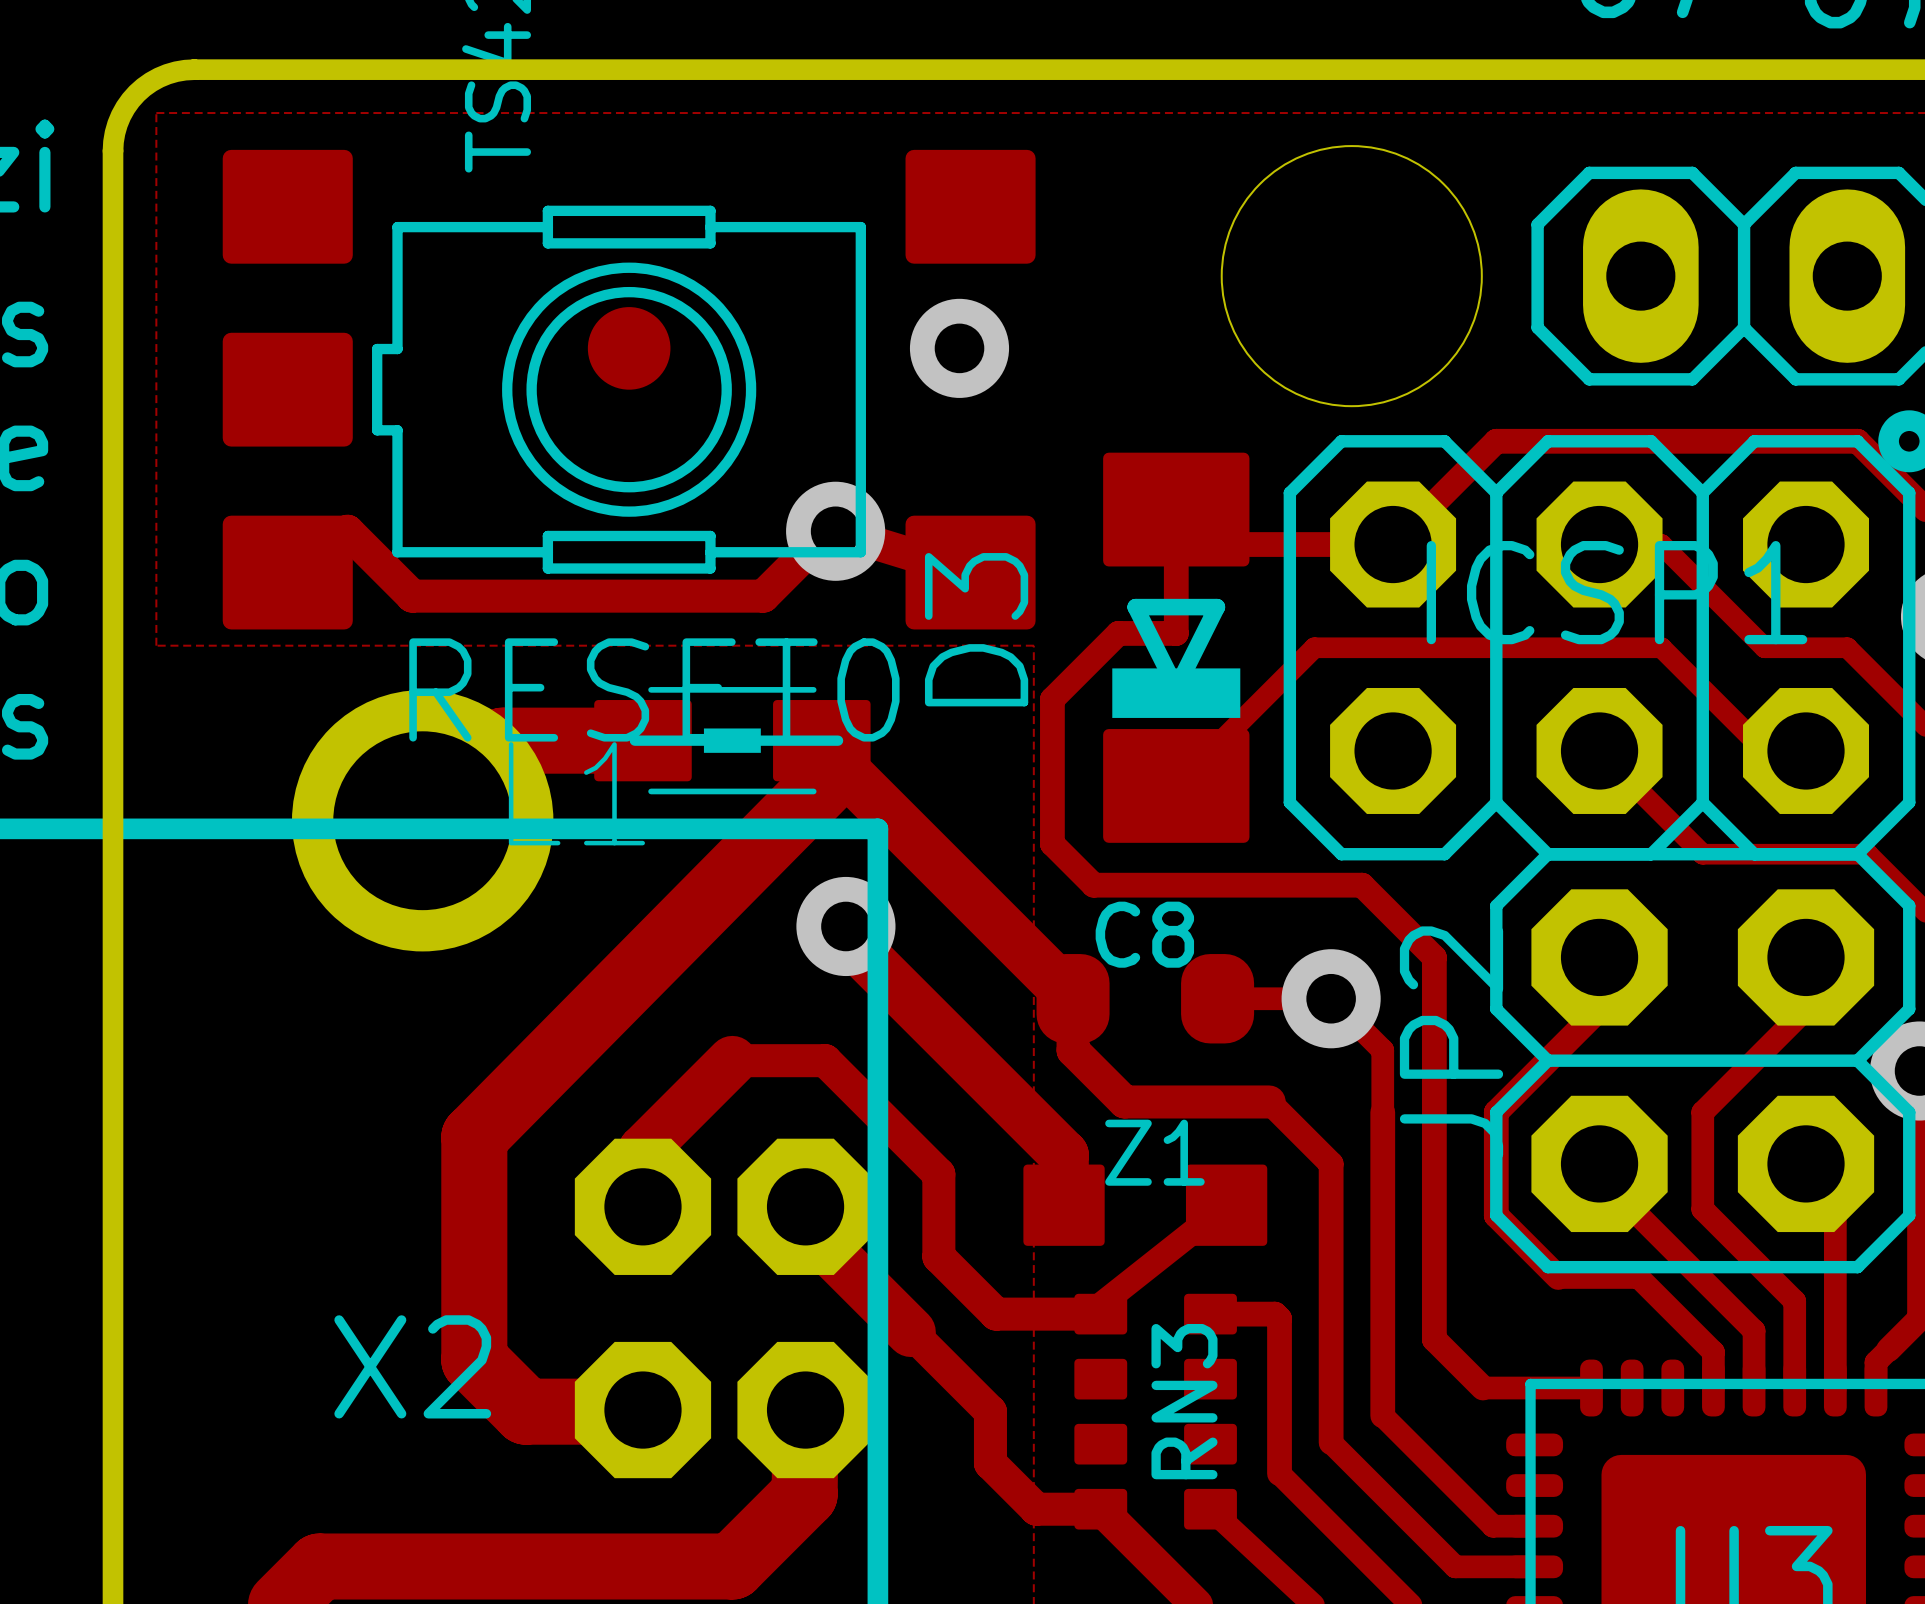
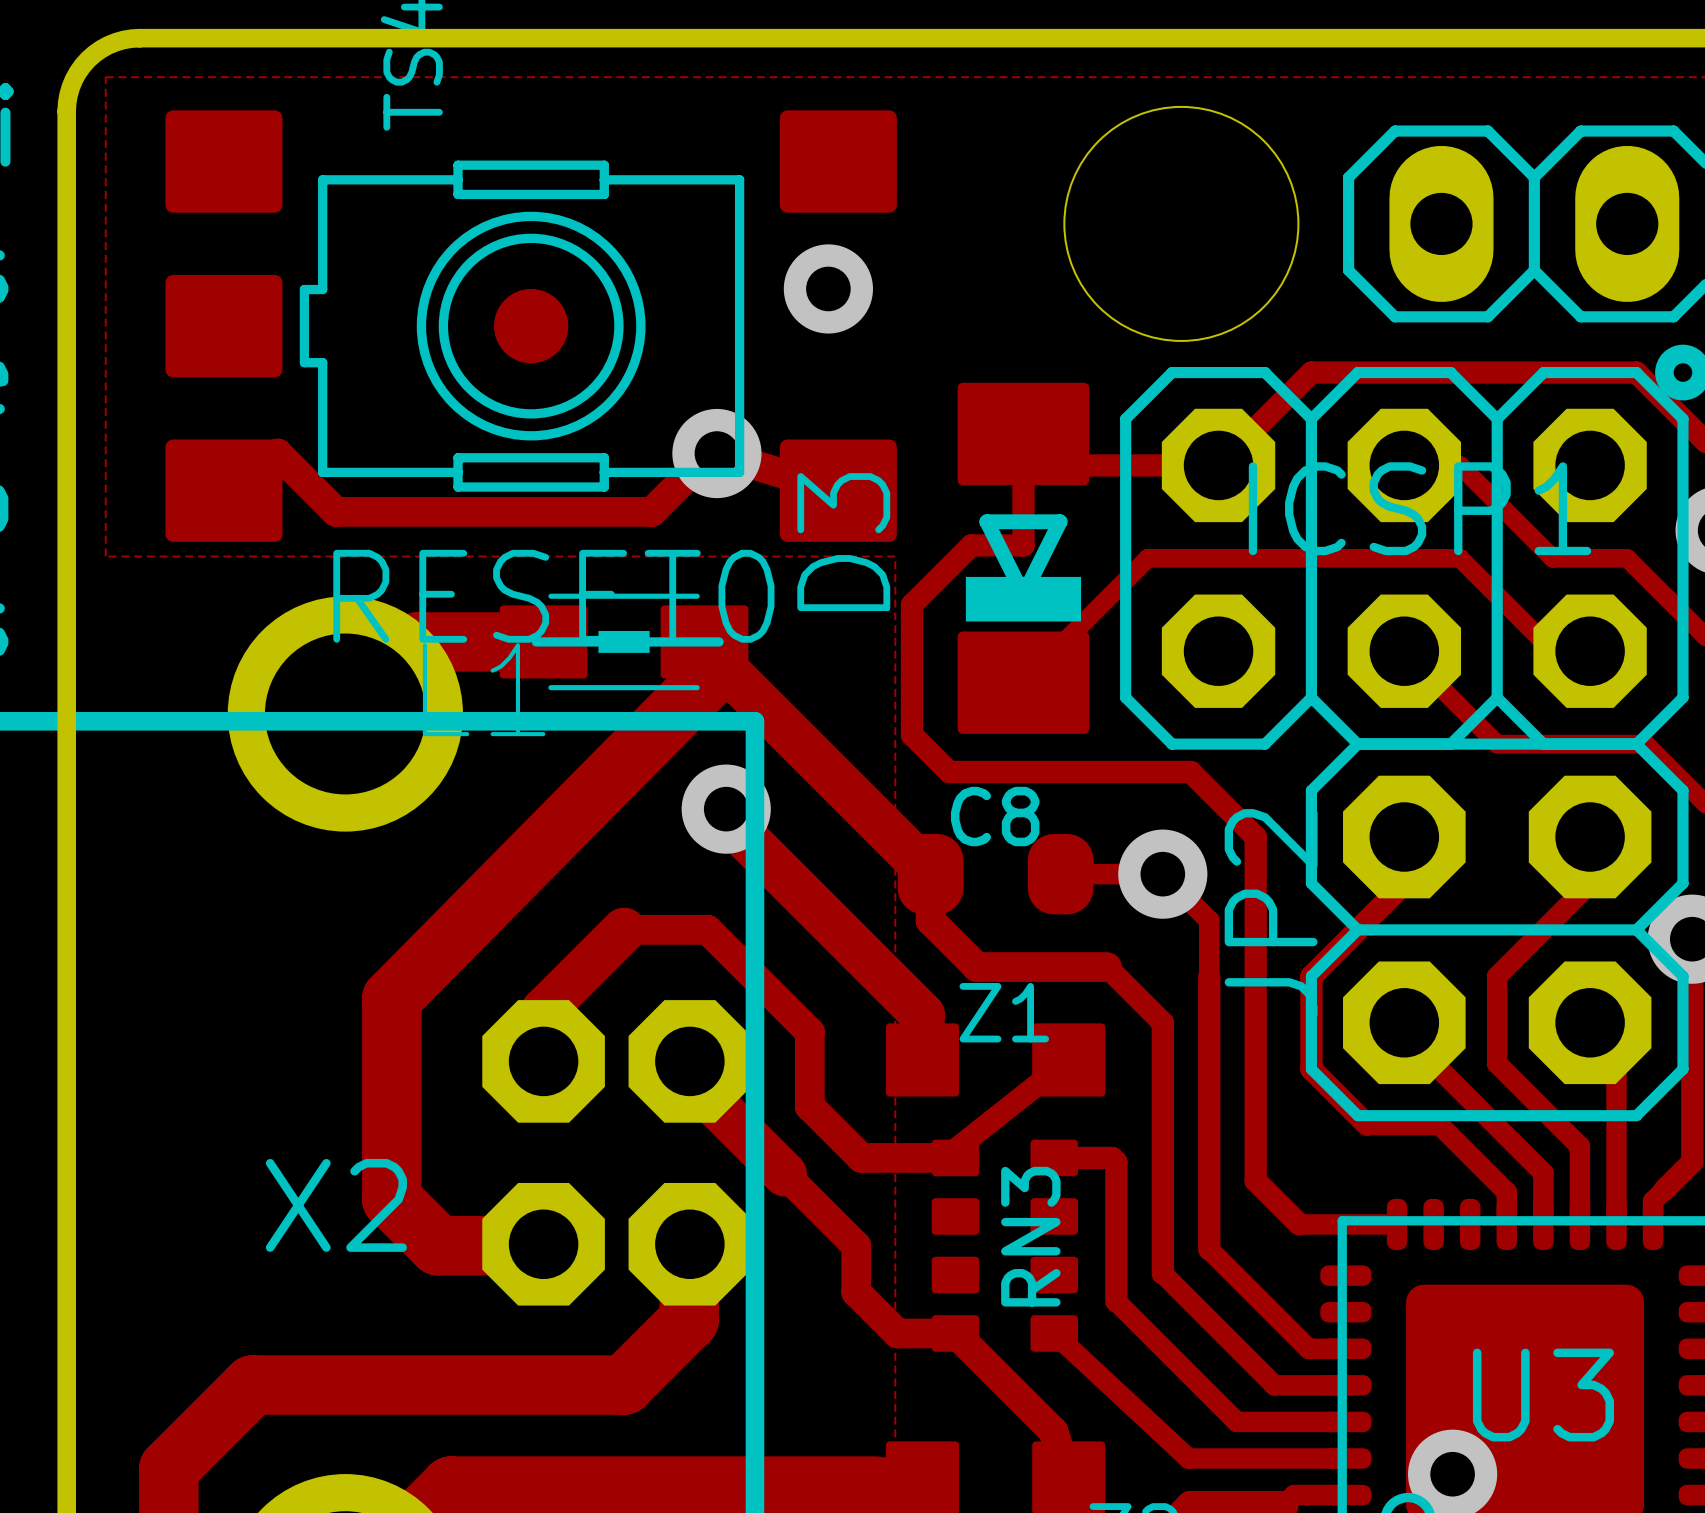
part position: (629, 348) -> (531, 326)

